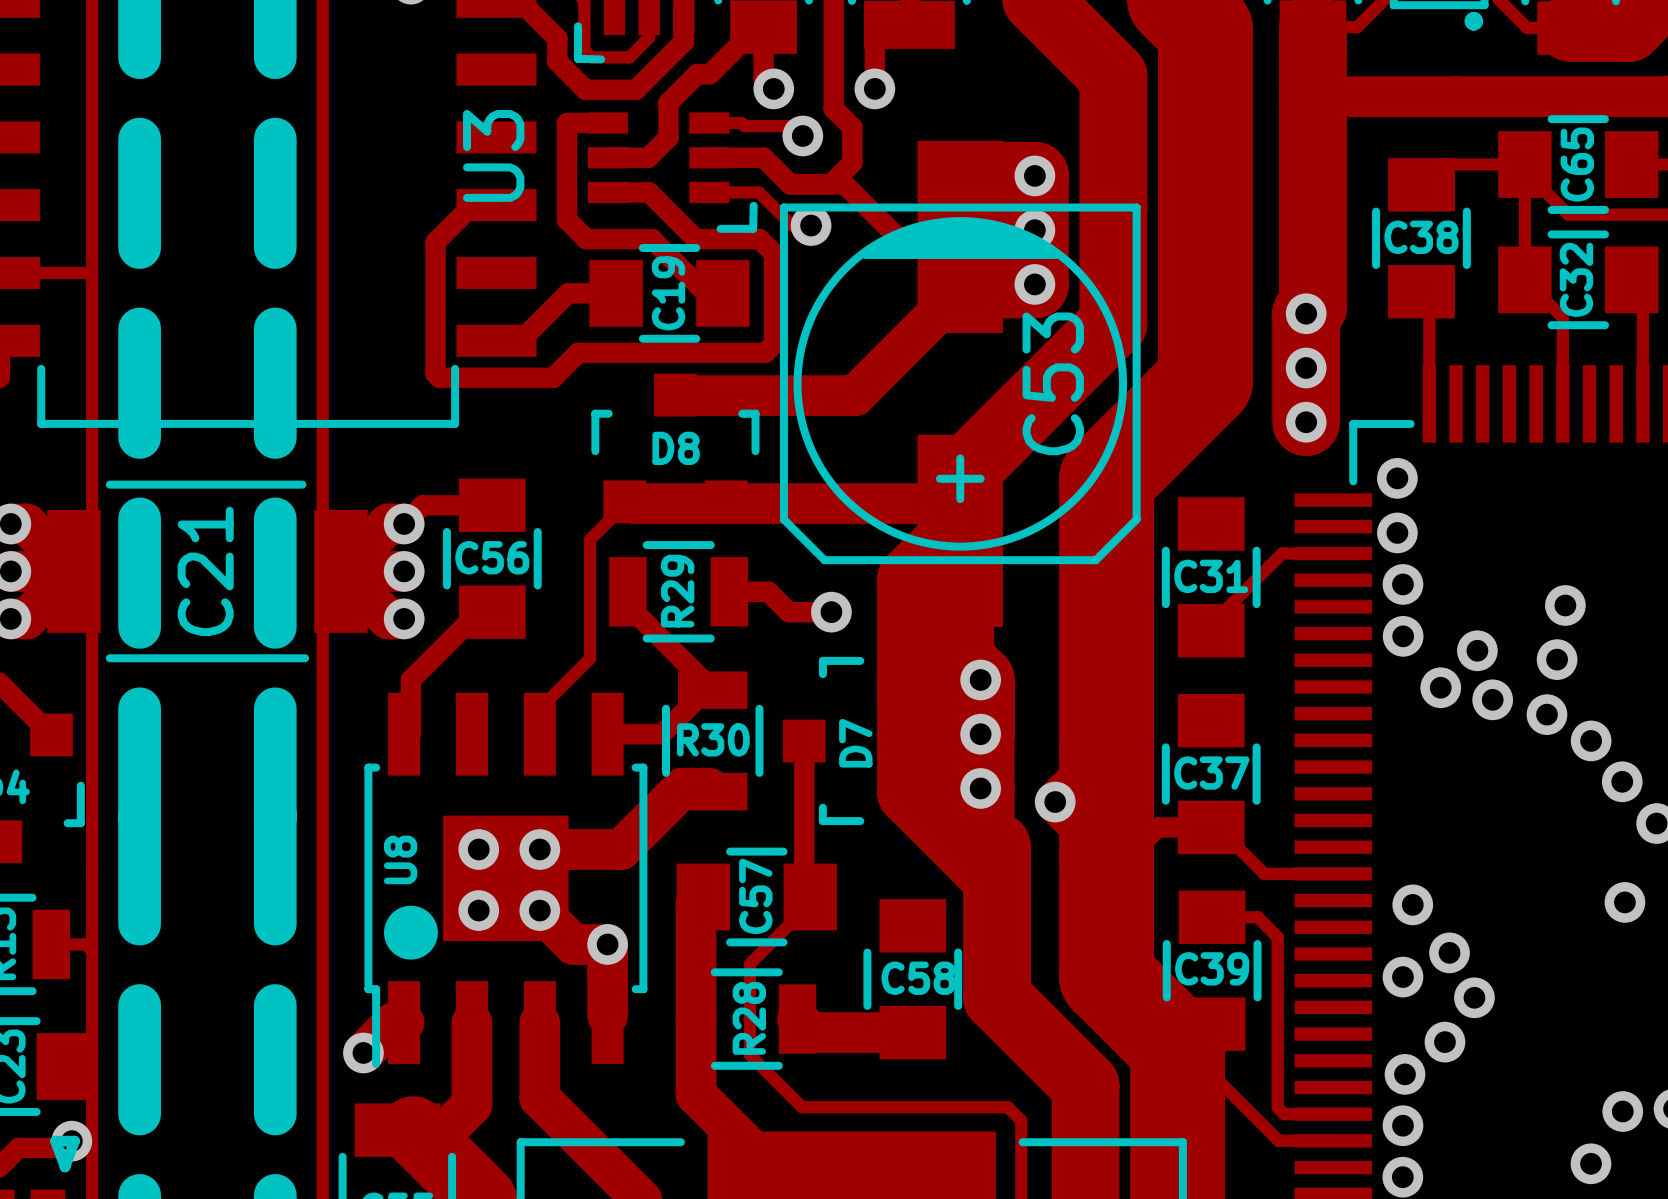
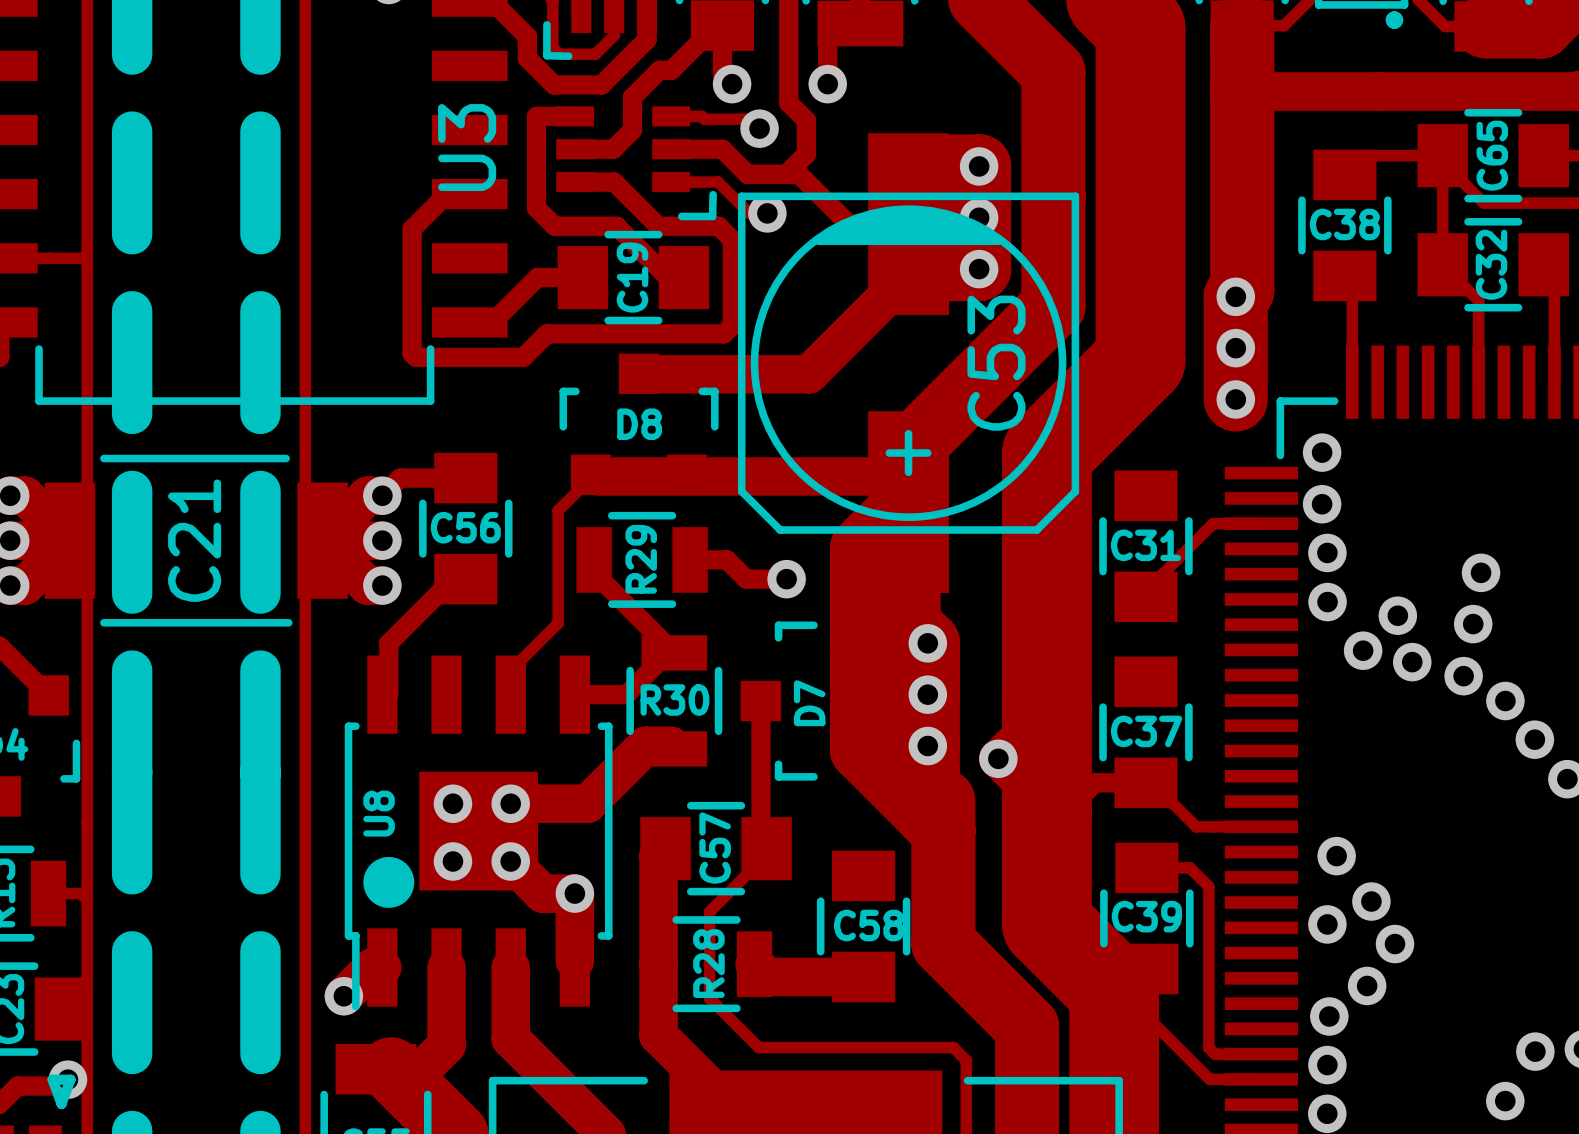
via: (1624, 902) -> none

